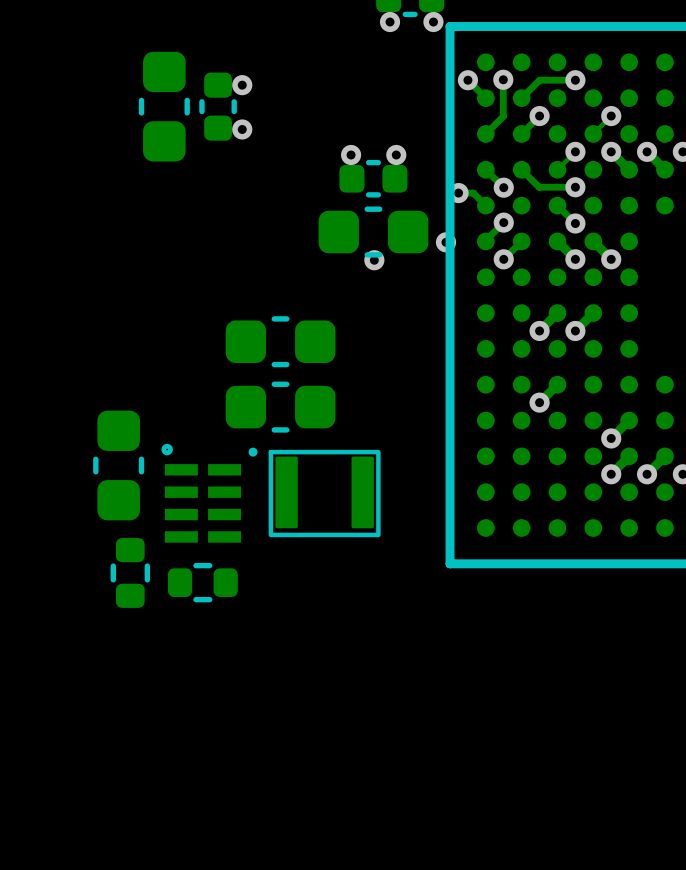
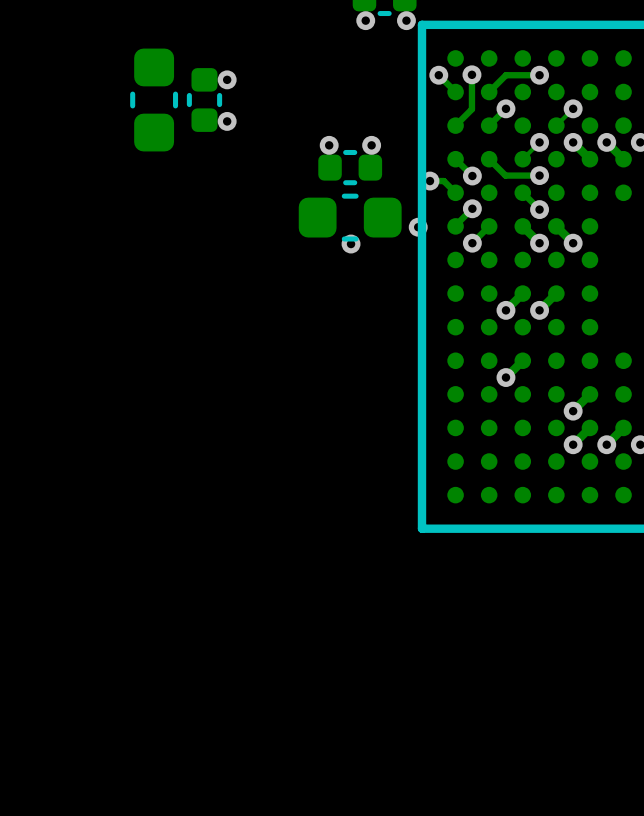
part: (280, 341) -> none
part: (280, 407) -> none
part: (118, 465) -> none
part: (314, 492) -> none
part: (201, 493) -> none
part: (130, 572) -> none
part: (202, 582) -> none

